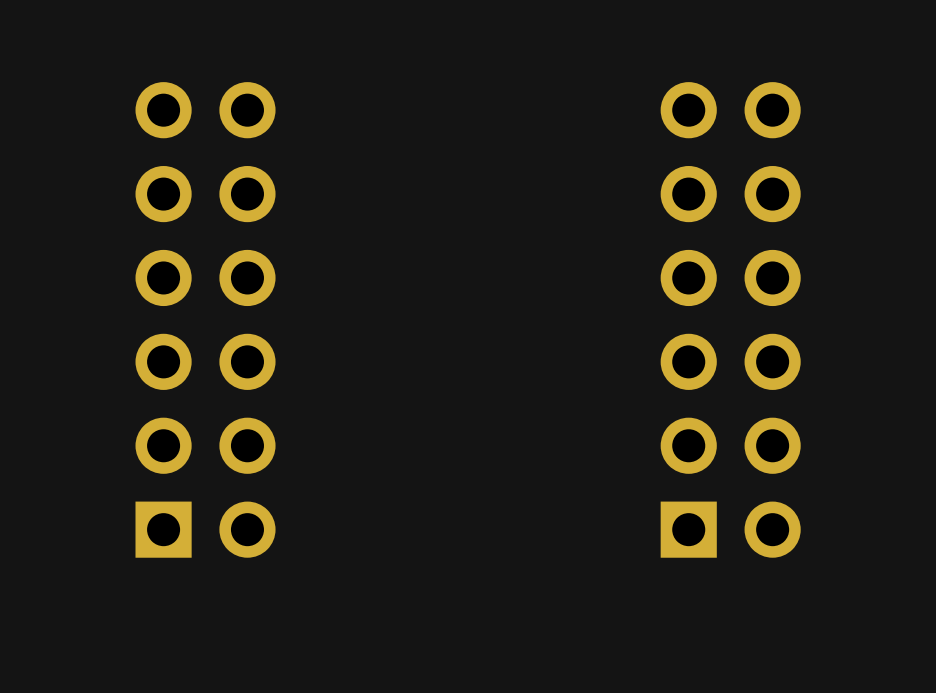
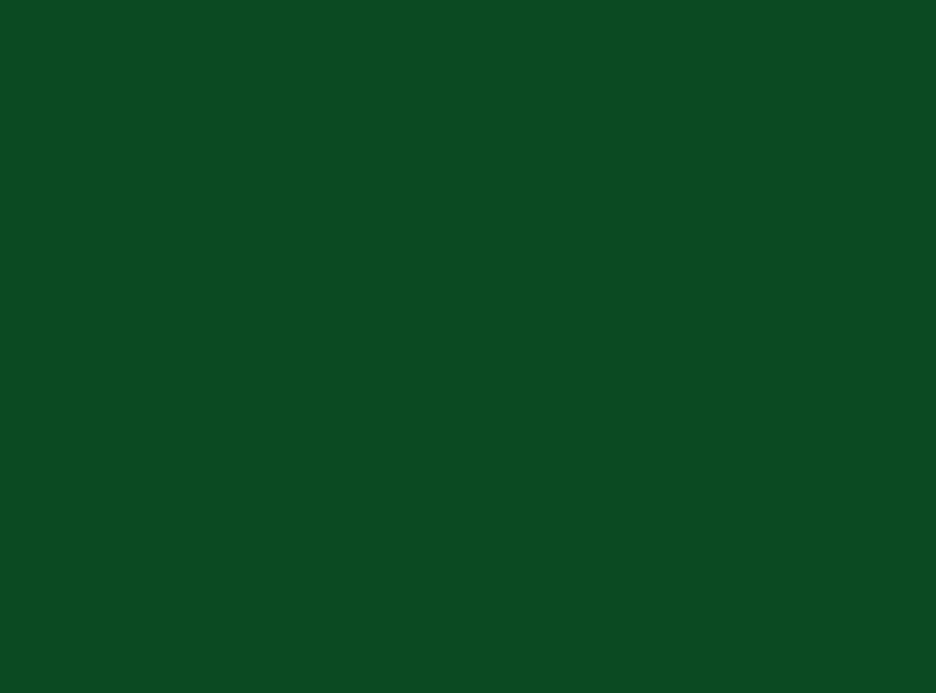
part: (205, 319) -> none
part: (730, 319) -> none

